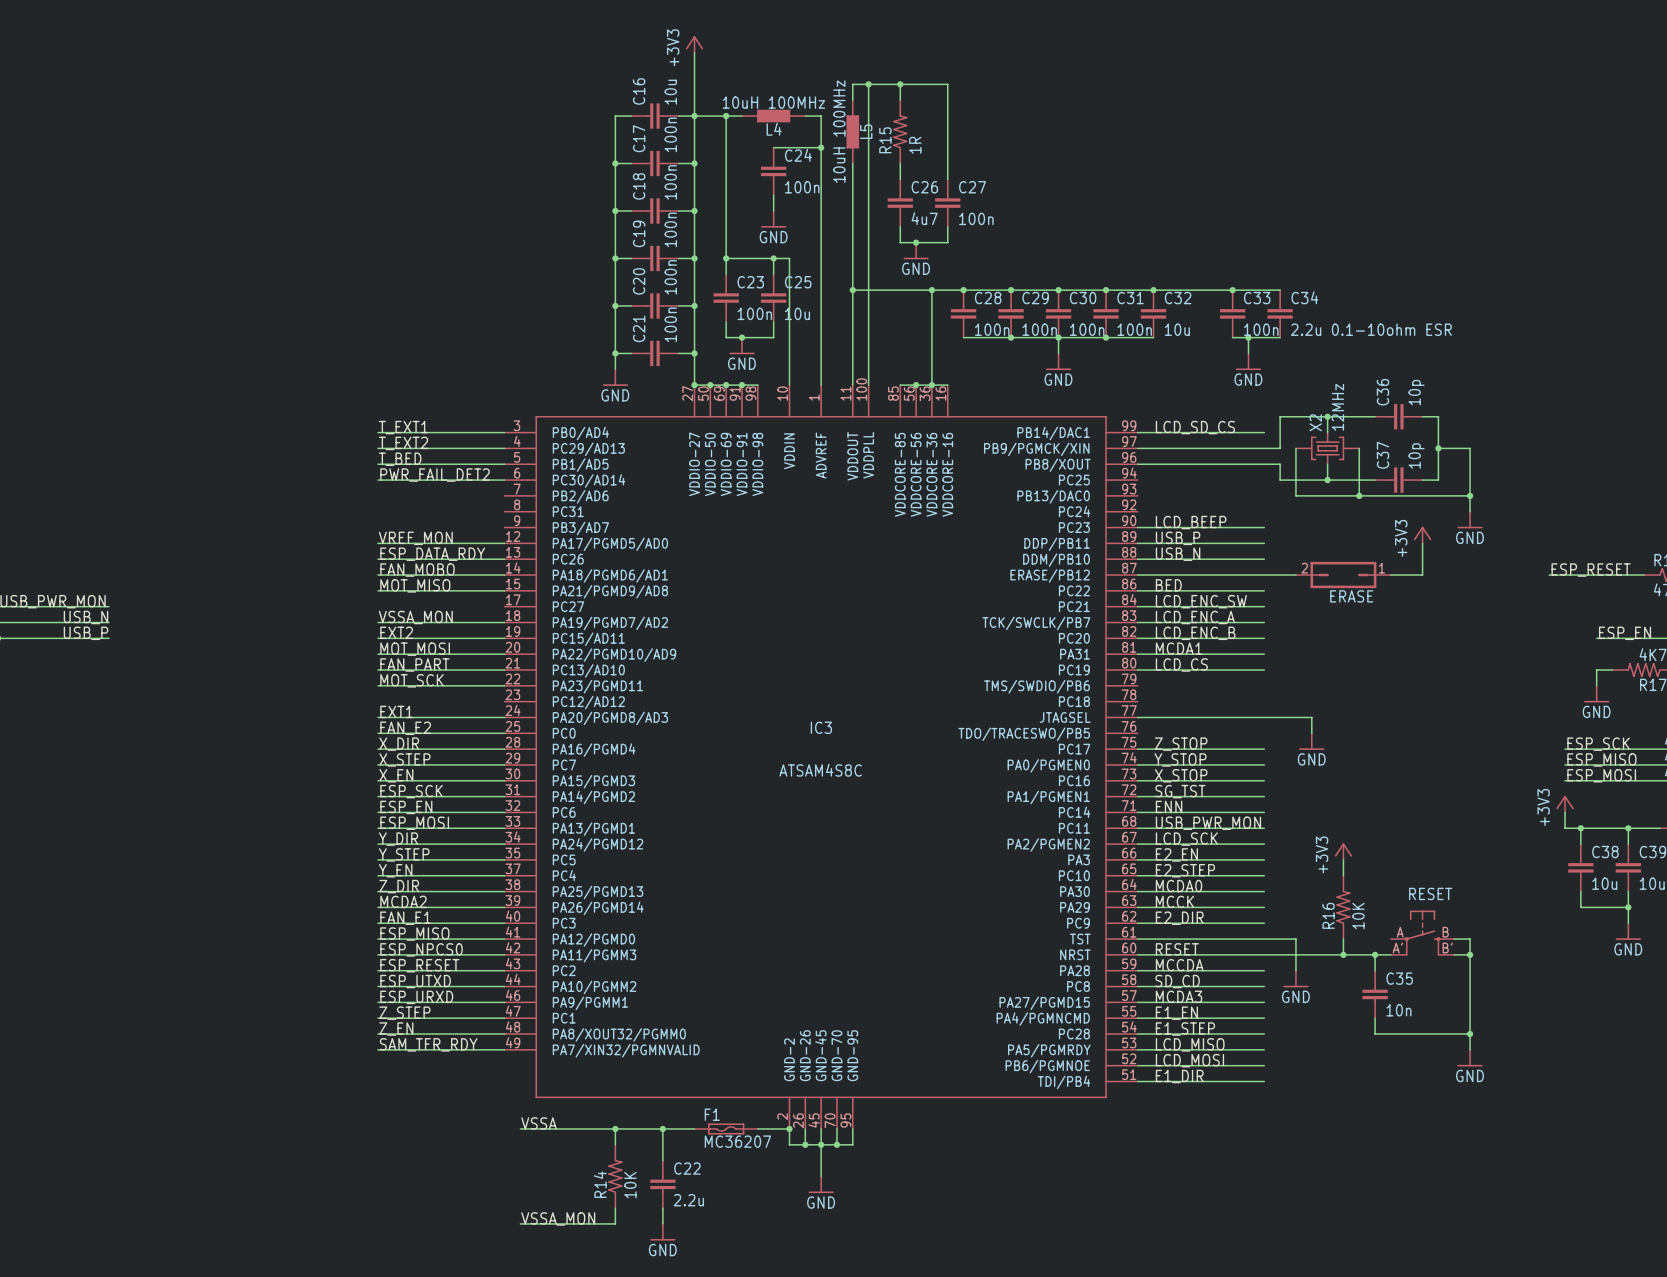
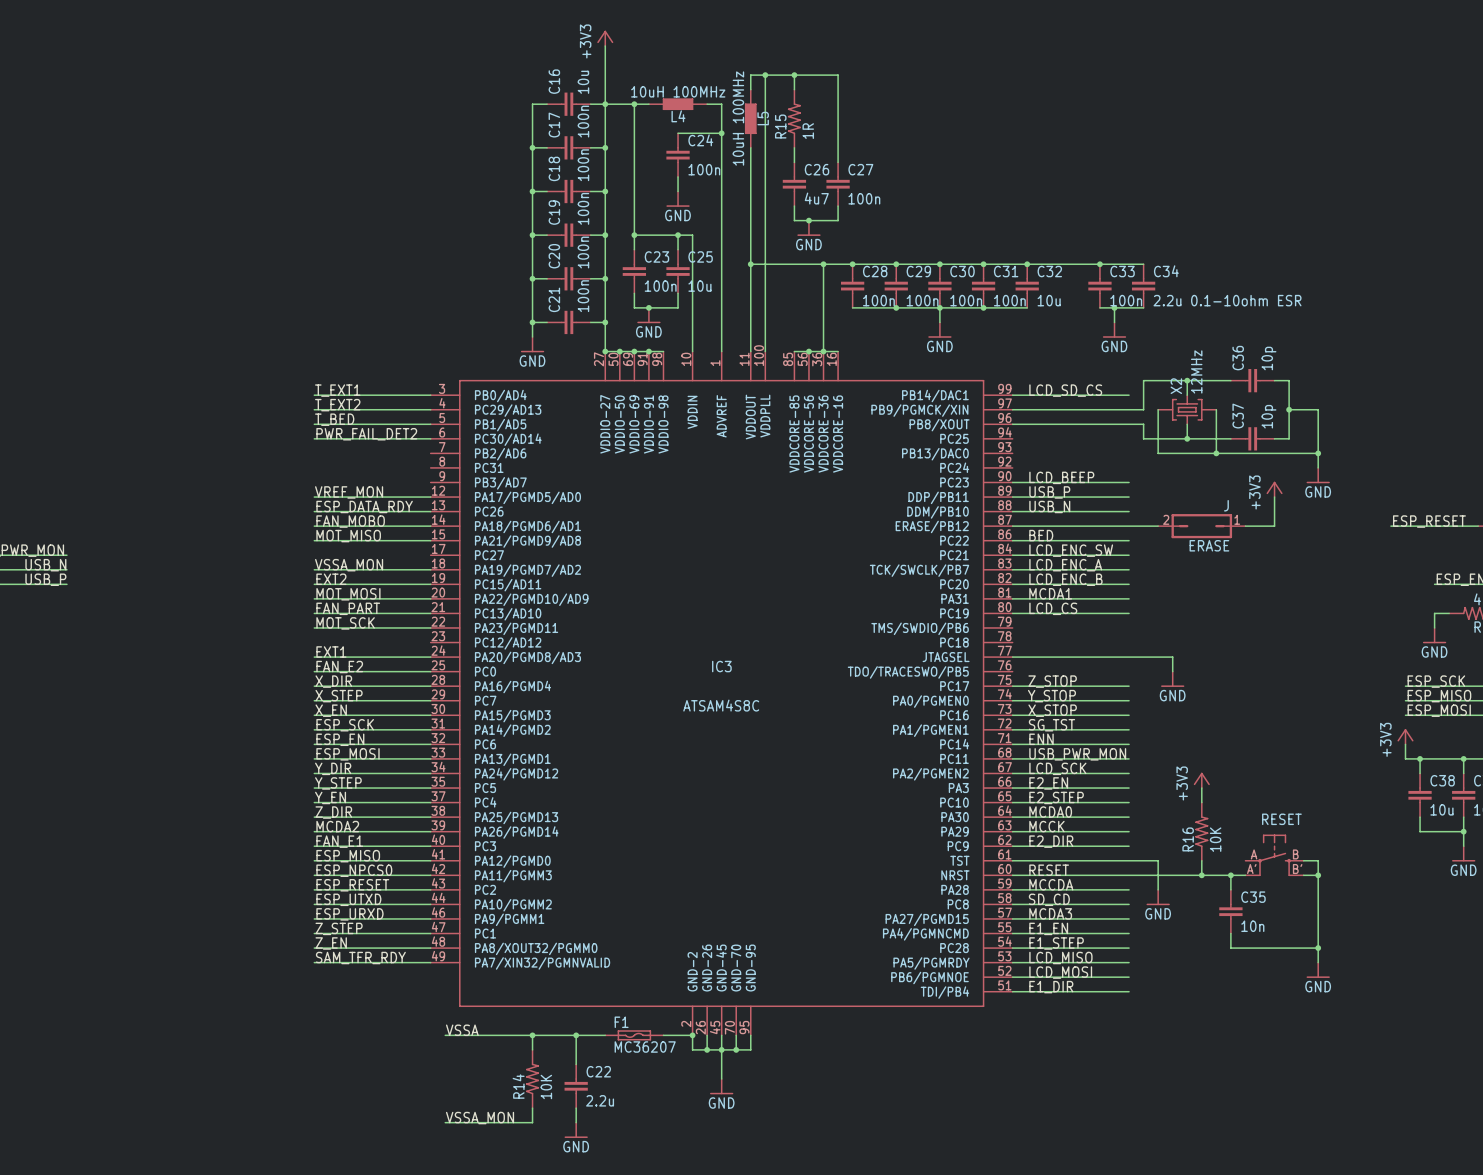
ERASE value: none -> J (1226, 505)

